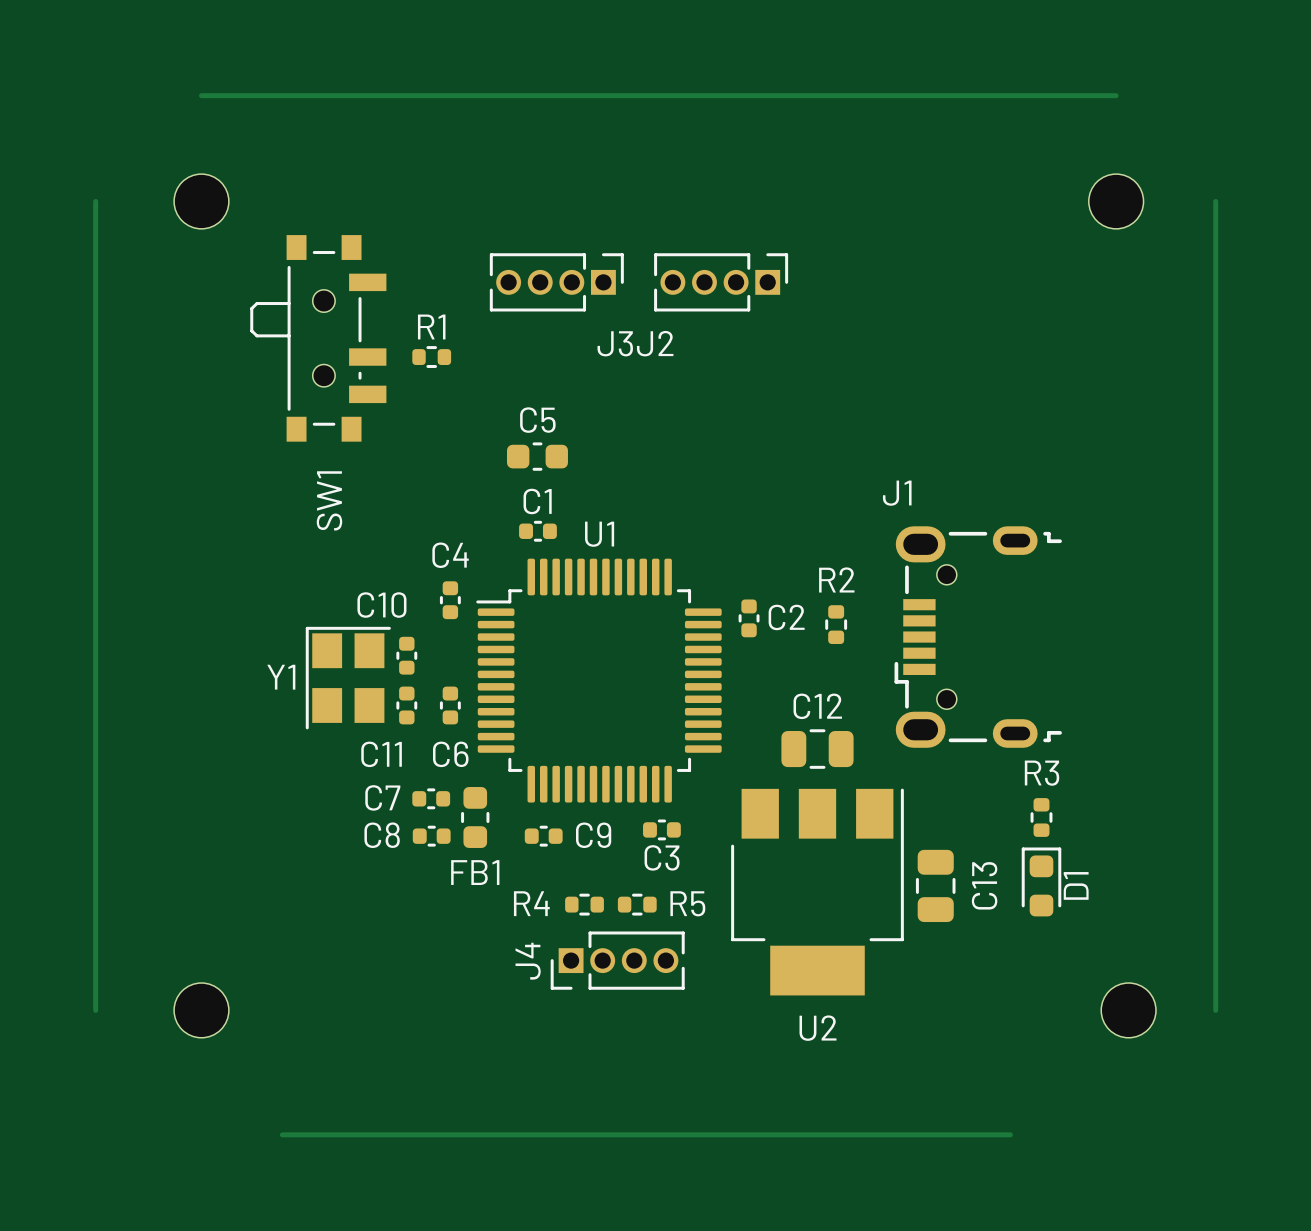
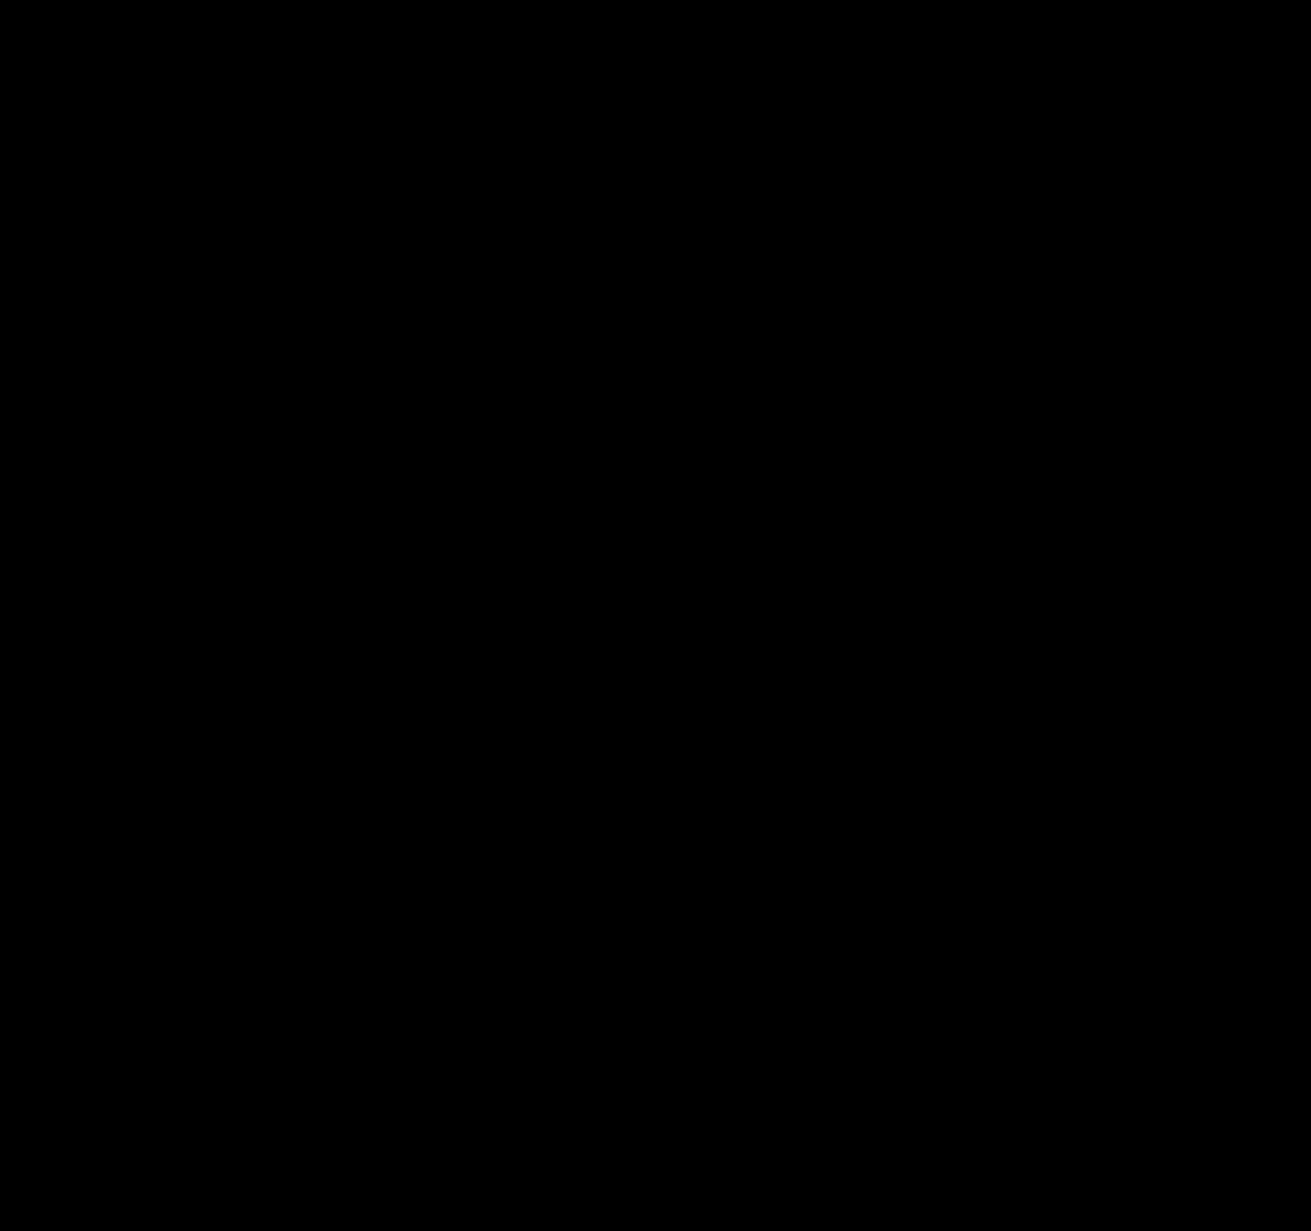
track: (201, 95) (1116, 95) -> none
track: (95, 201) (95, 1010) -> none
part: (201, 201) -> none
part: (1116, 201) -> none
track: (1215, 201) (1215, 1010) -> none
J3: (556, 282) -> none
J2: (721, 282) -> none
SW1: (318, 338) -> none
R1: (431, 357) -> none
C5: (537, 456) -> none
C1: (537, 531) -> none
C4: (450, 600) -> none
C2: (749, 618) -> none
R2: (836, 624) -> none
J1: (978, 637) -> none
C10: (406, 655) -> none
Y1: (348, 678) -> none
U1: (598, 680) -> none
C11: (406, 705) -> none
C6: (450, 705) -> none
C12: (817, 749) -> none
C7: (431, 798) -> none
FB1: (475, 817) -> none
R3: (1041, 817) -> none
C3: (661, 829) -> none
C8: (431, 836) -> none
C9: (543, 836) -> none
D1: (1041, 881) -> none
C13: (935, 885) -> none
U2: (817, 892) -> none
R4: (584, 904) -> none
R5: (637, 904) -> none
J4: (617, 960) -> none
part: (201, 1010) -> none
part: (1128, 1010) -> none
track: (282, 1134) (1010, 1134) -> none

